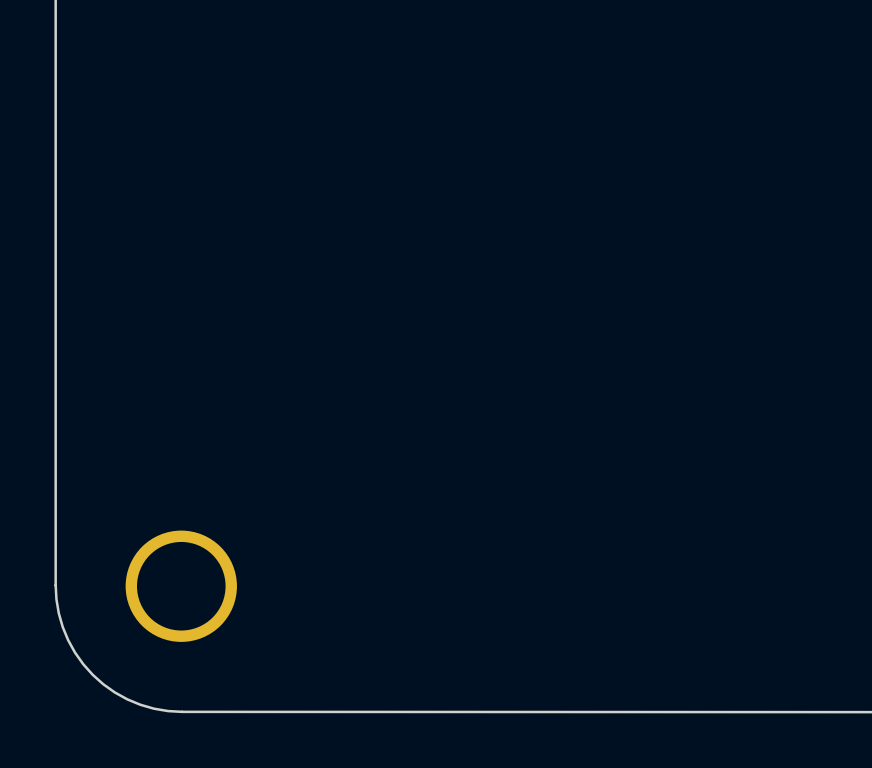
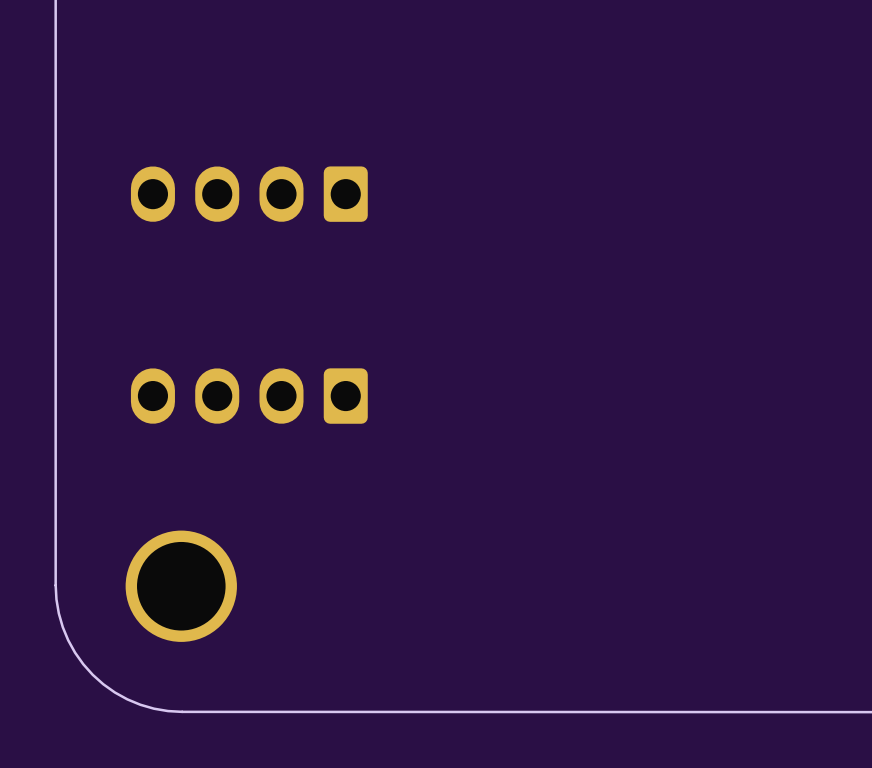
part: none -> (249, 194)
part: none -> (249, 396)

